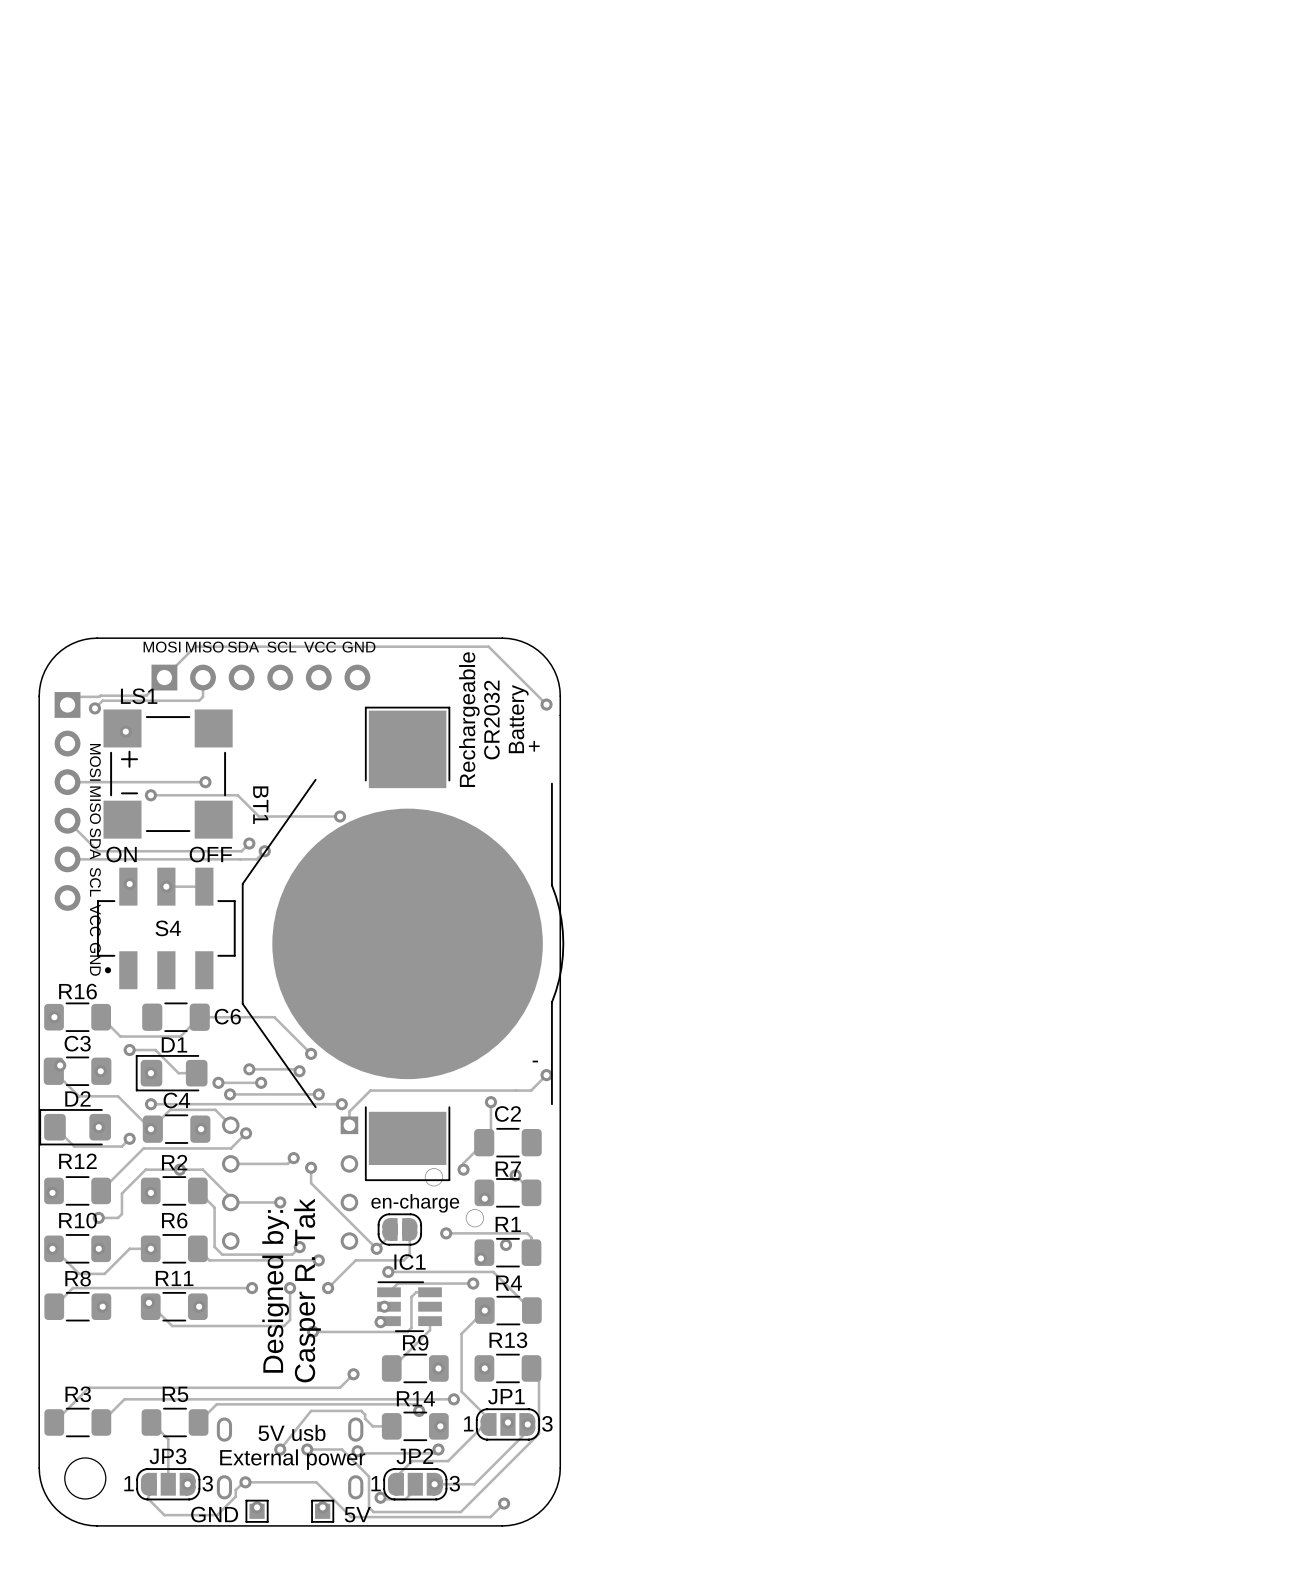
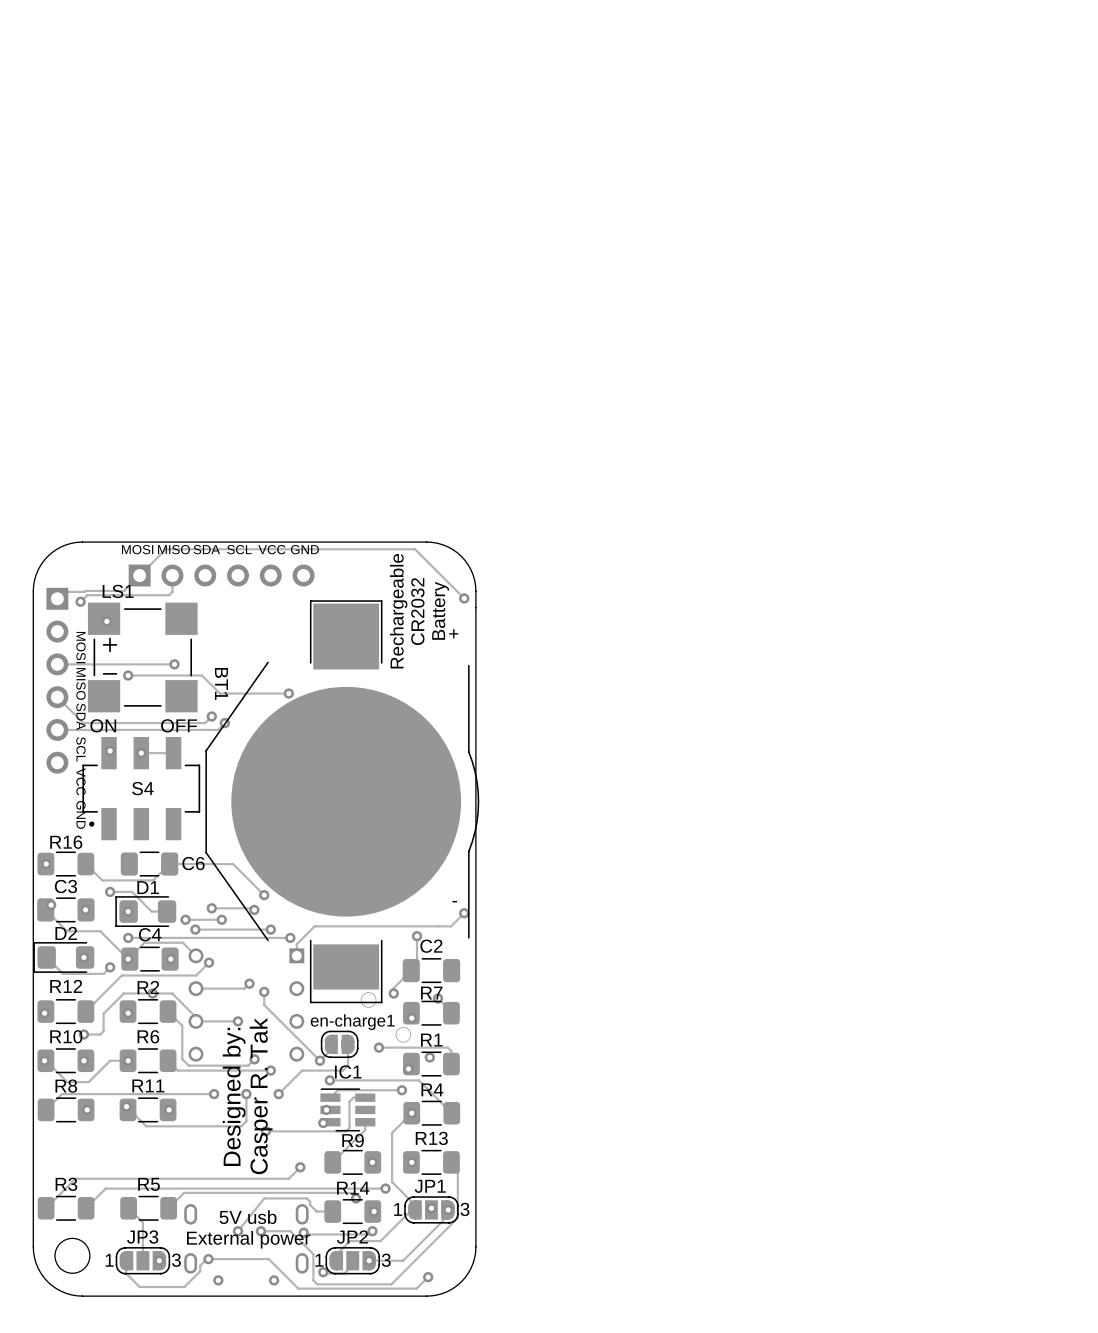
en-charge name: en-charge (415, 1203) -> en-charge1 (352, 1022)
GND: (257, 1511) -> none
5V: (322, 1511) -> none

